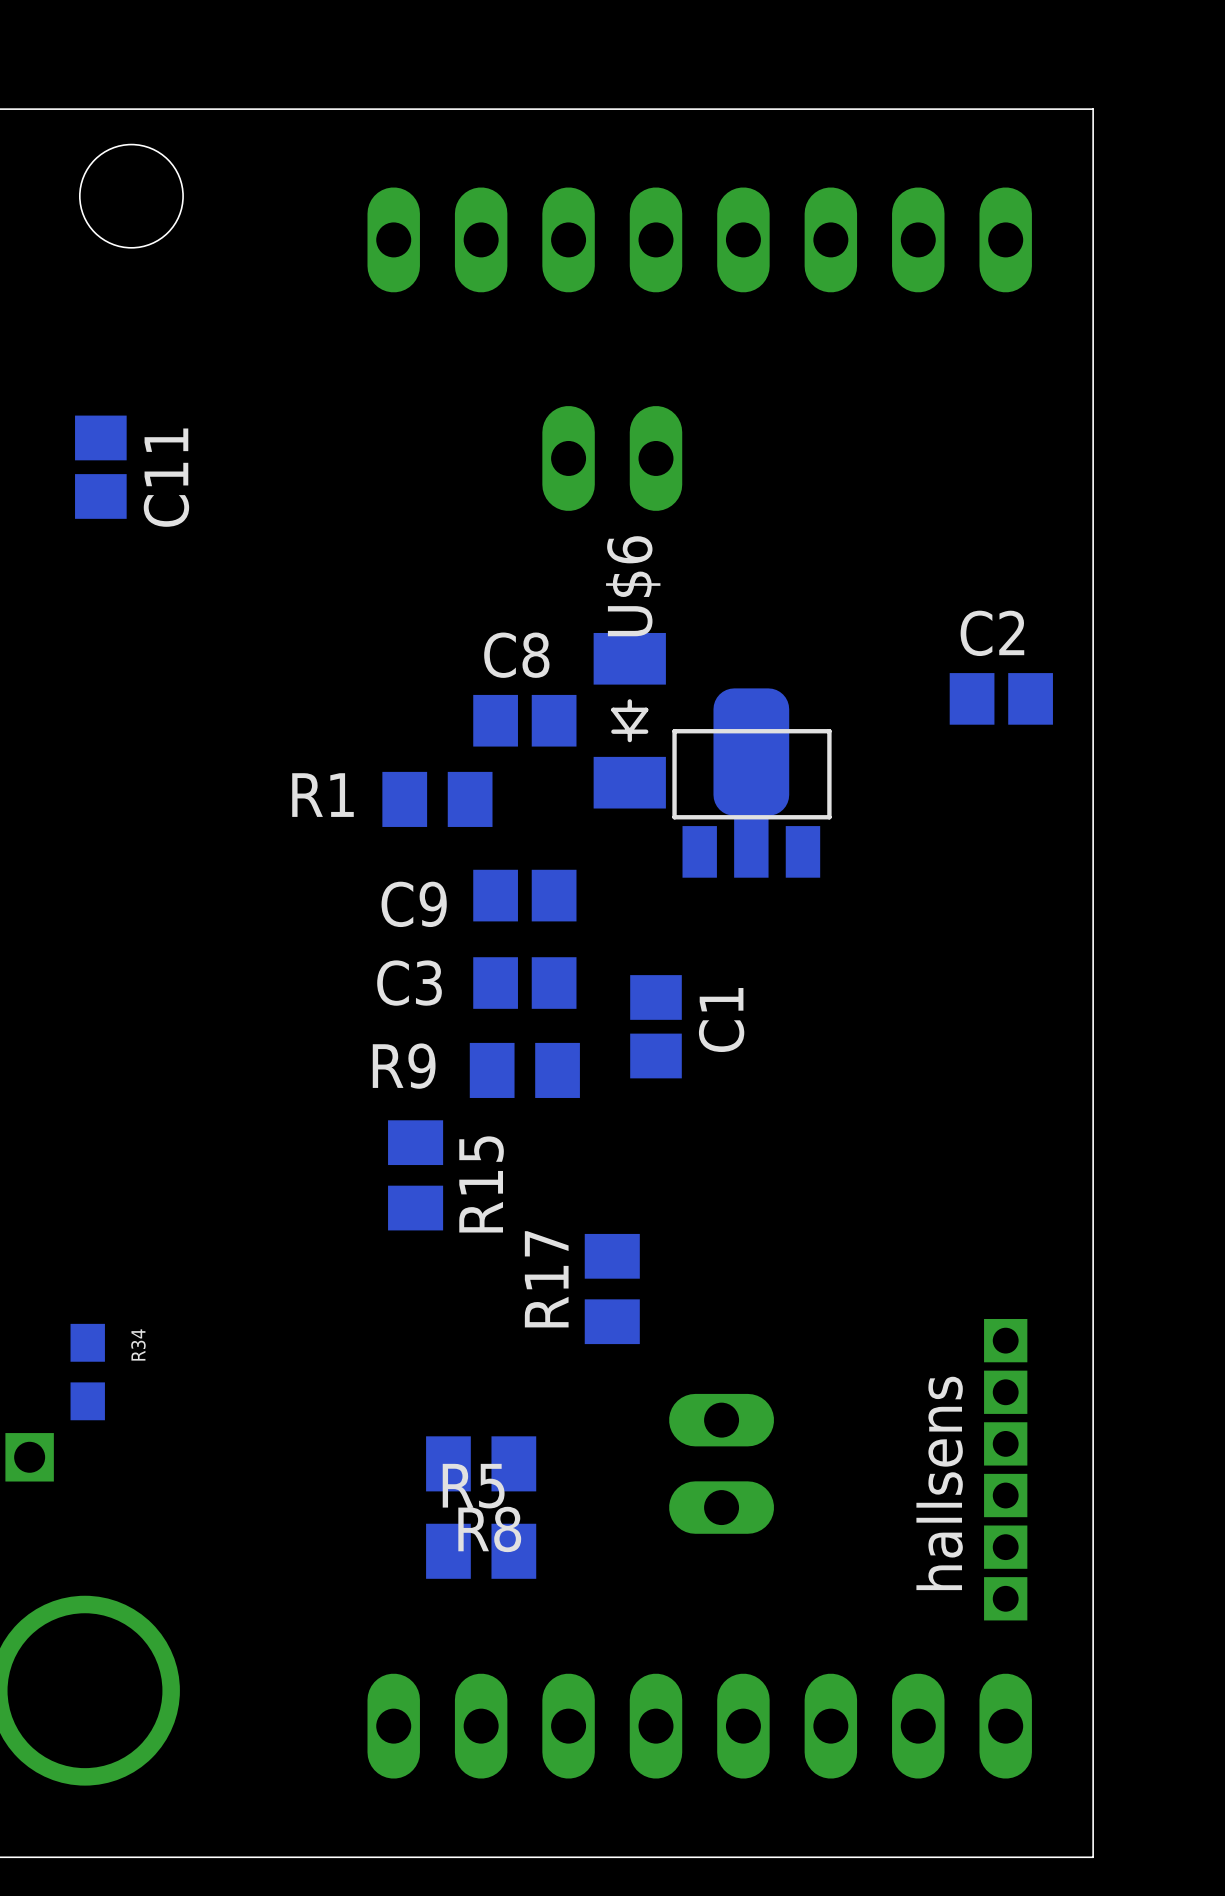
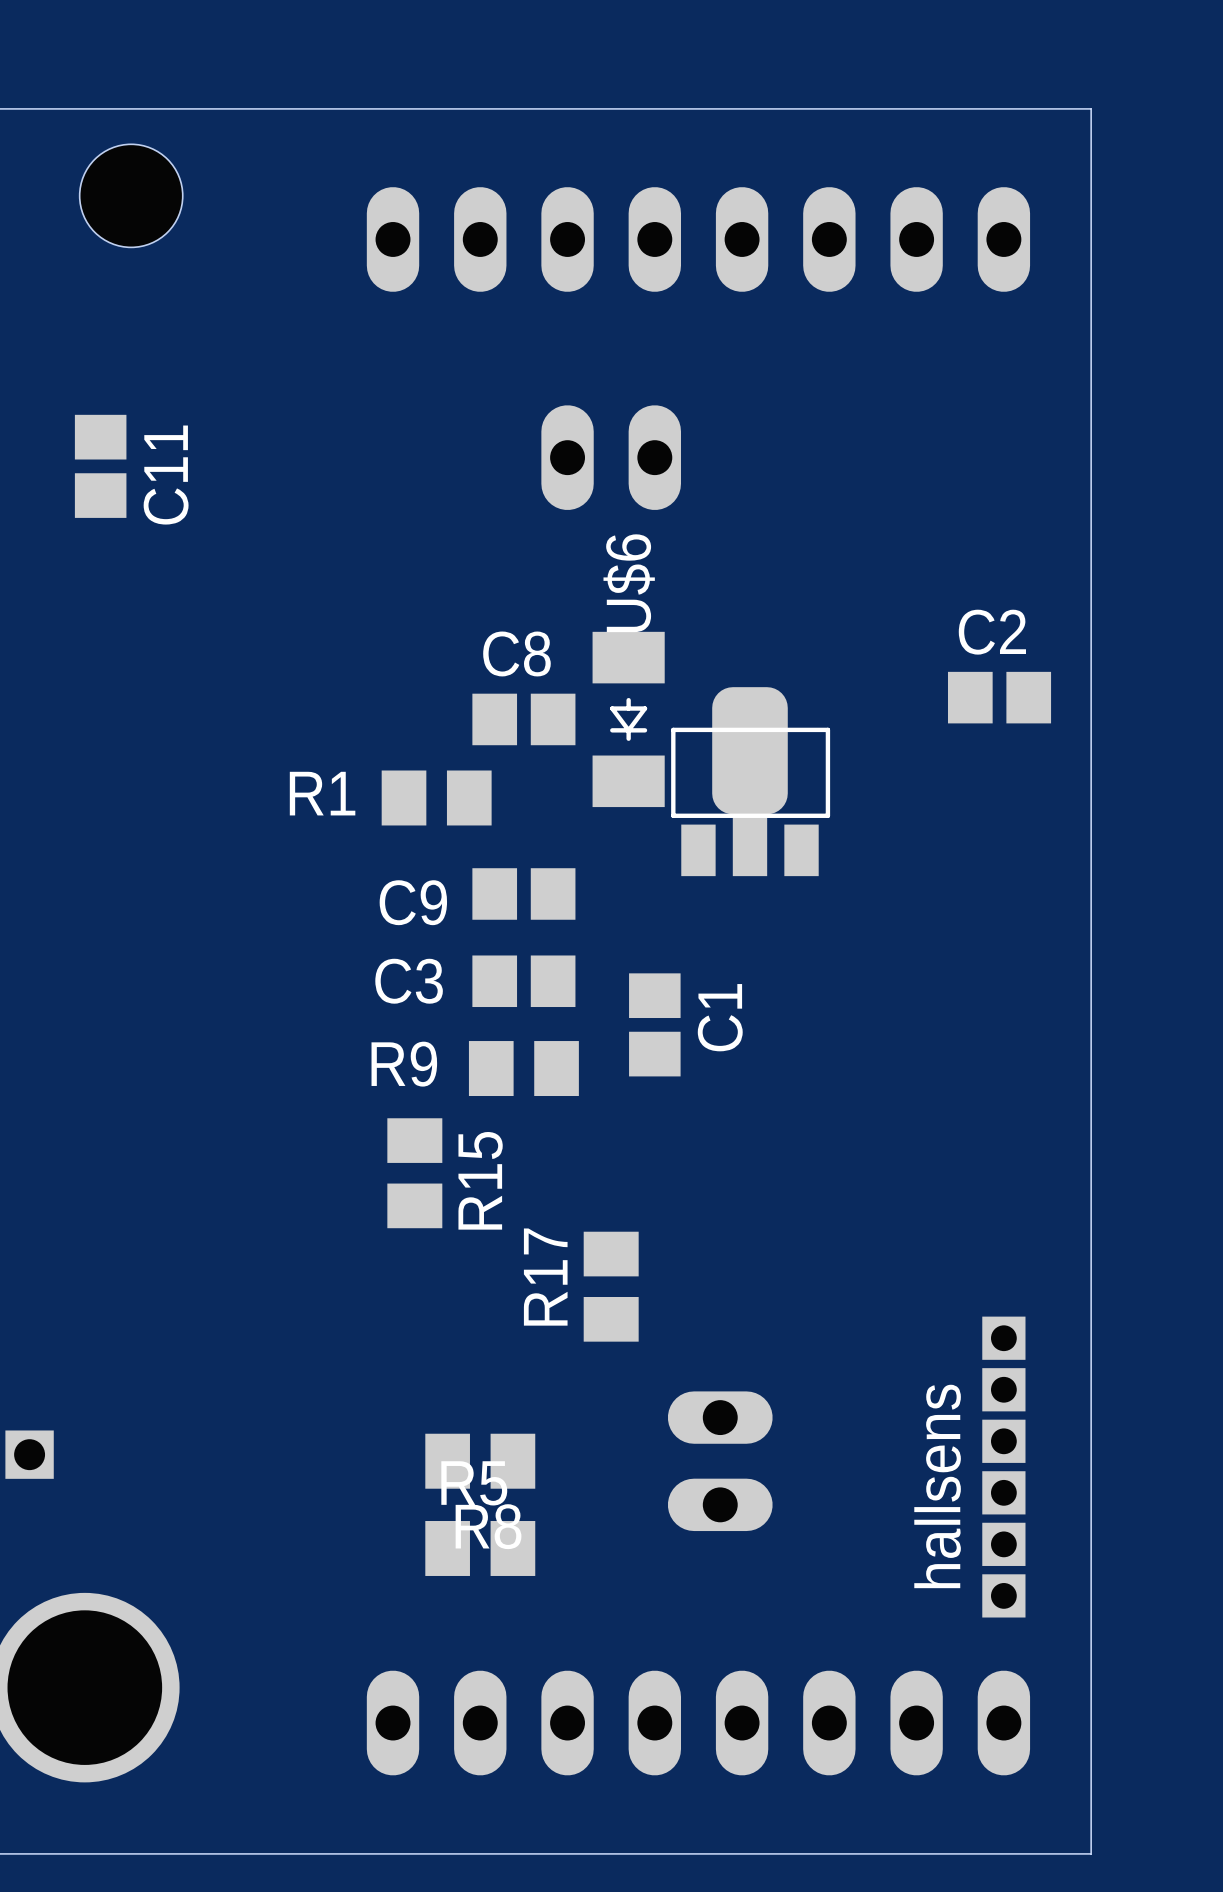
R34: (87, 1372) -> none

